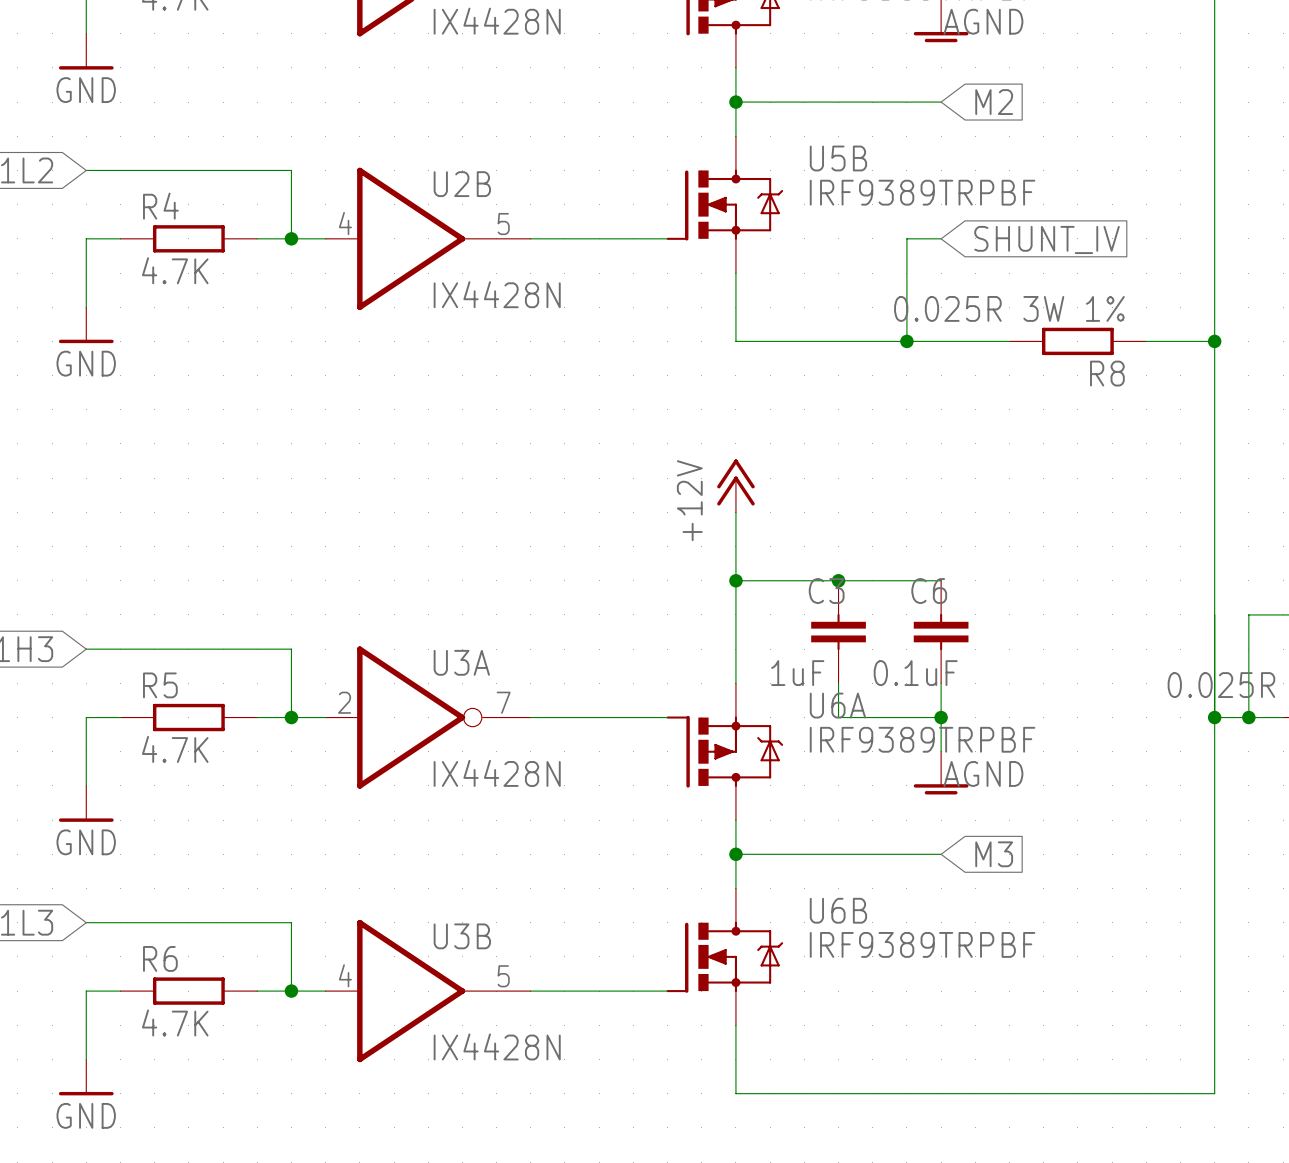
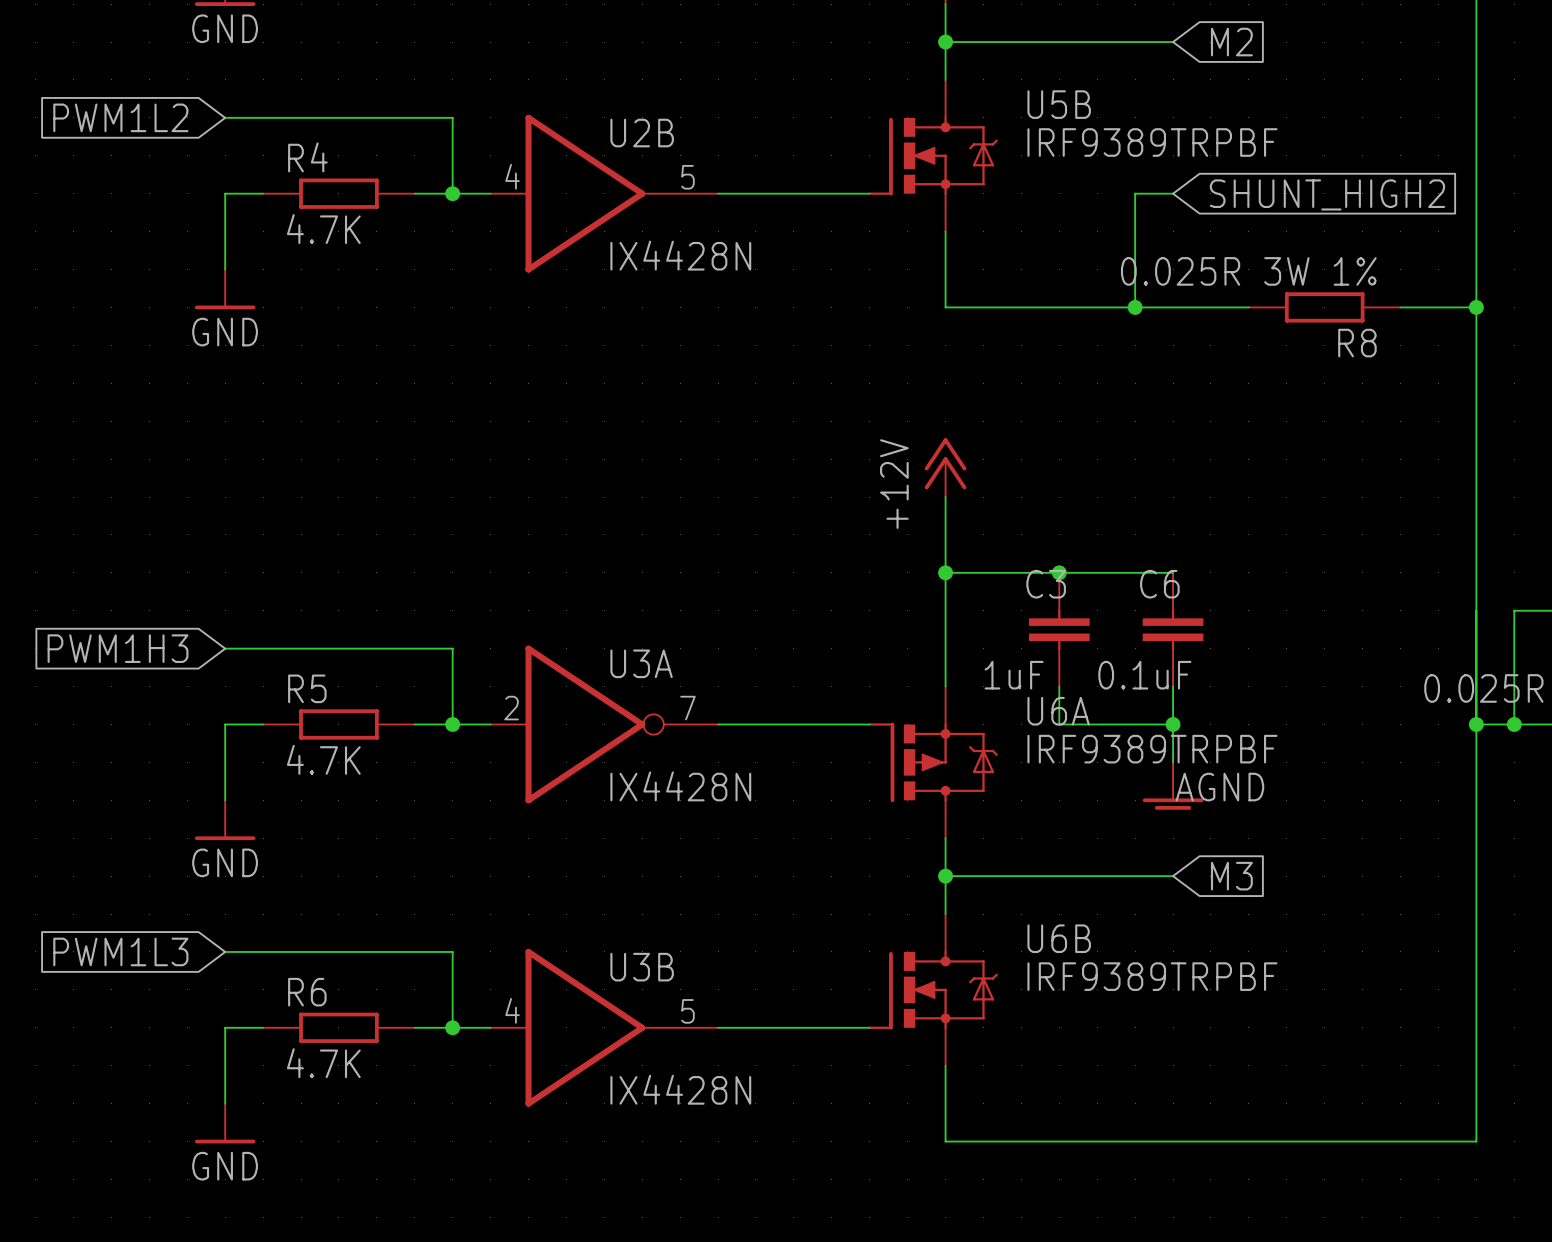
global label: SHUNT_IV (1047, 239) -> SHUNT_HIGH2 (1327, 194)

